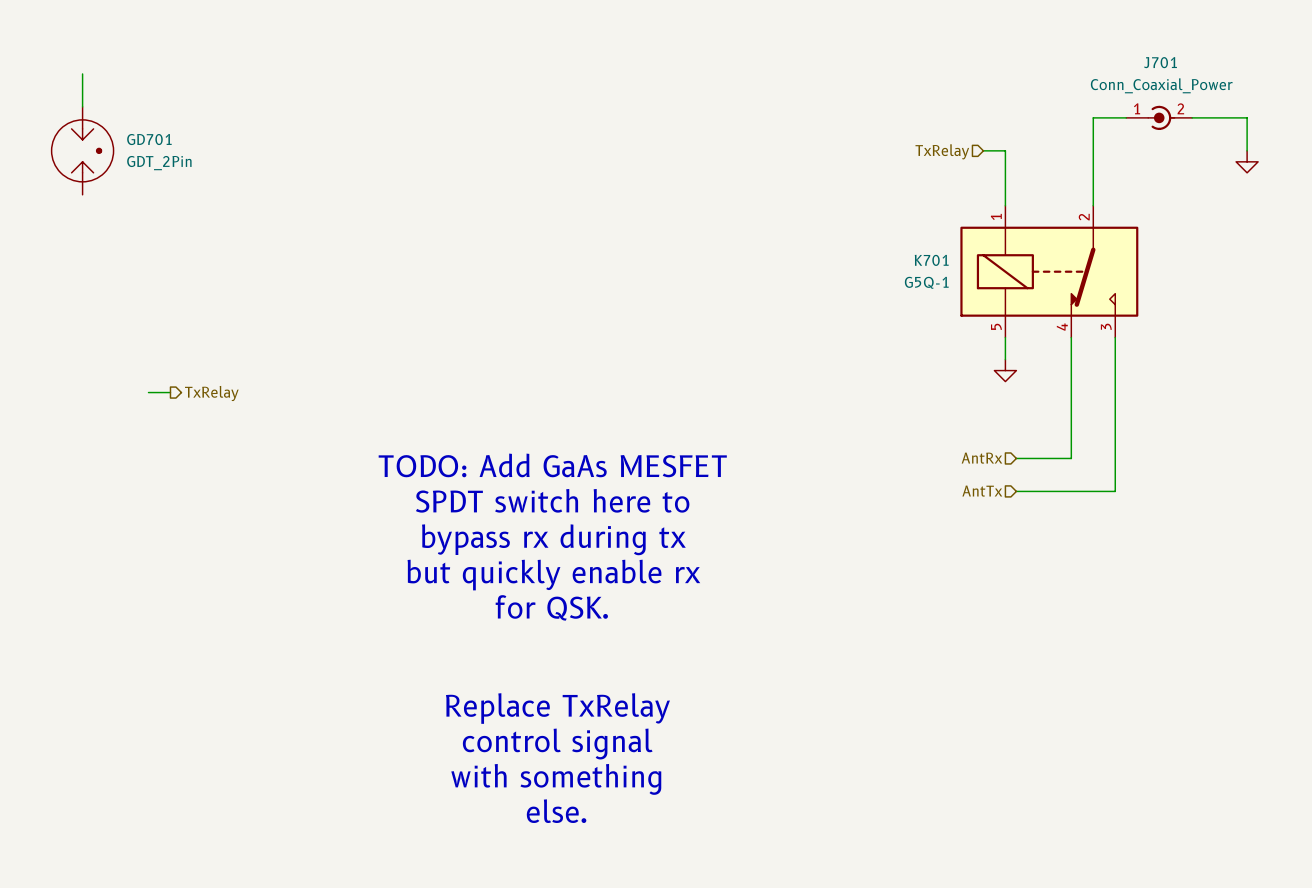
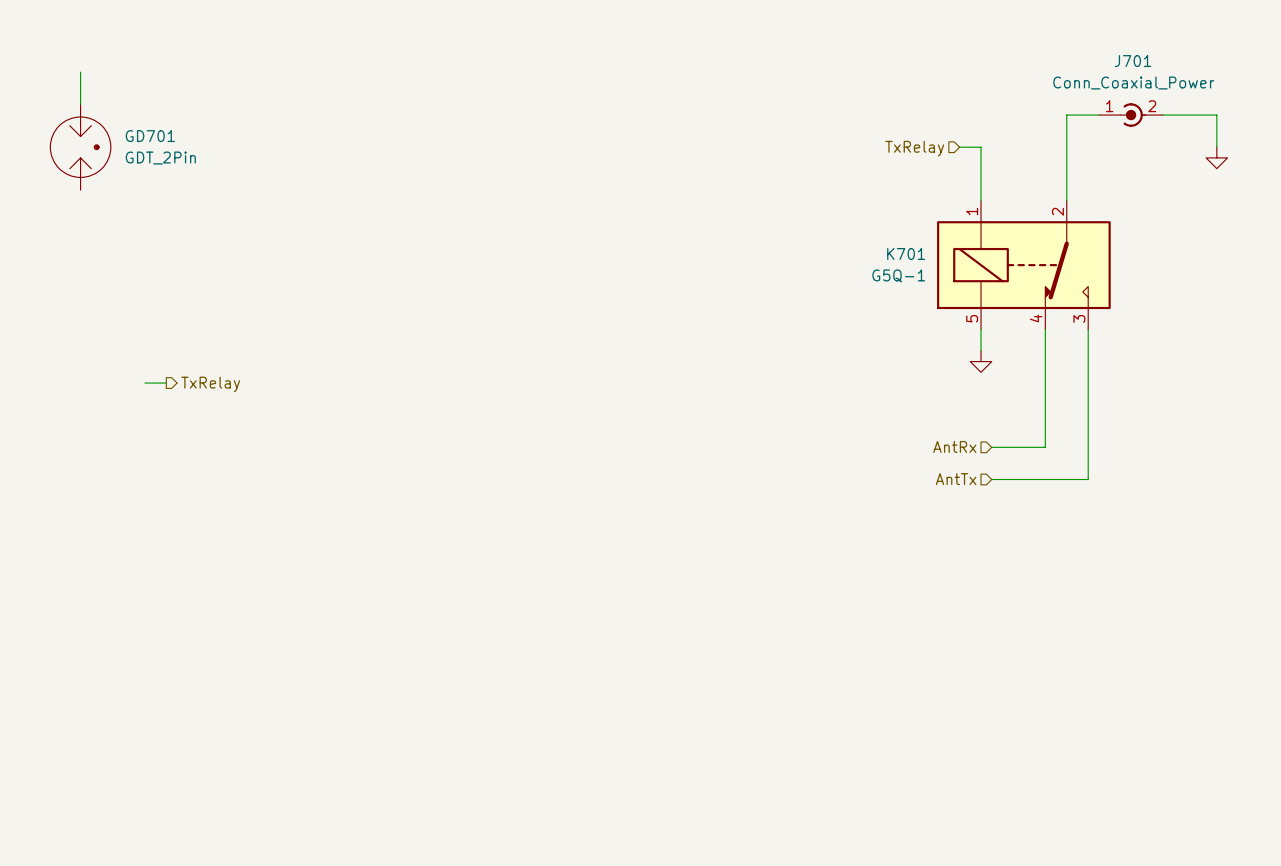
text: TODO: Add GaAs MESFET (552, 465) -> none
text: SPDT switch here to (552, 500) -> none
text: bypass rx during tx (553, 539) -> none
text: but quickly enable rx (553, 575) -> none
text: for QSK. (551, 607) -> none
text: Replace TxRelay (557, 708) -> none
text: control signal (557, 744) -> none
text: with something (556, 779) -> none
text: else. (556, 811) -> none

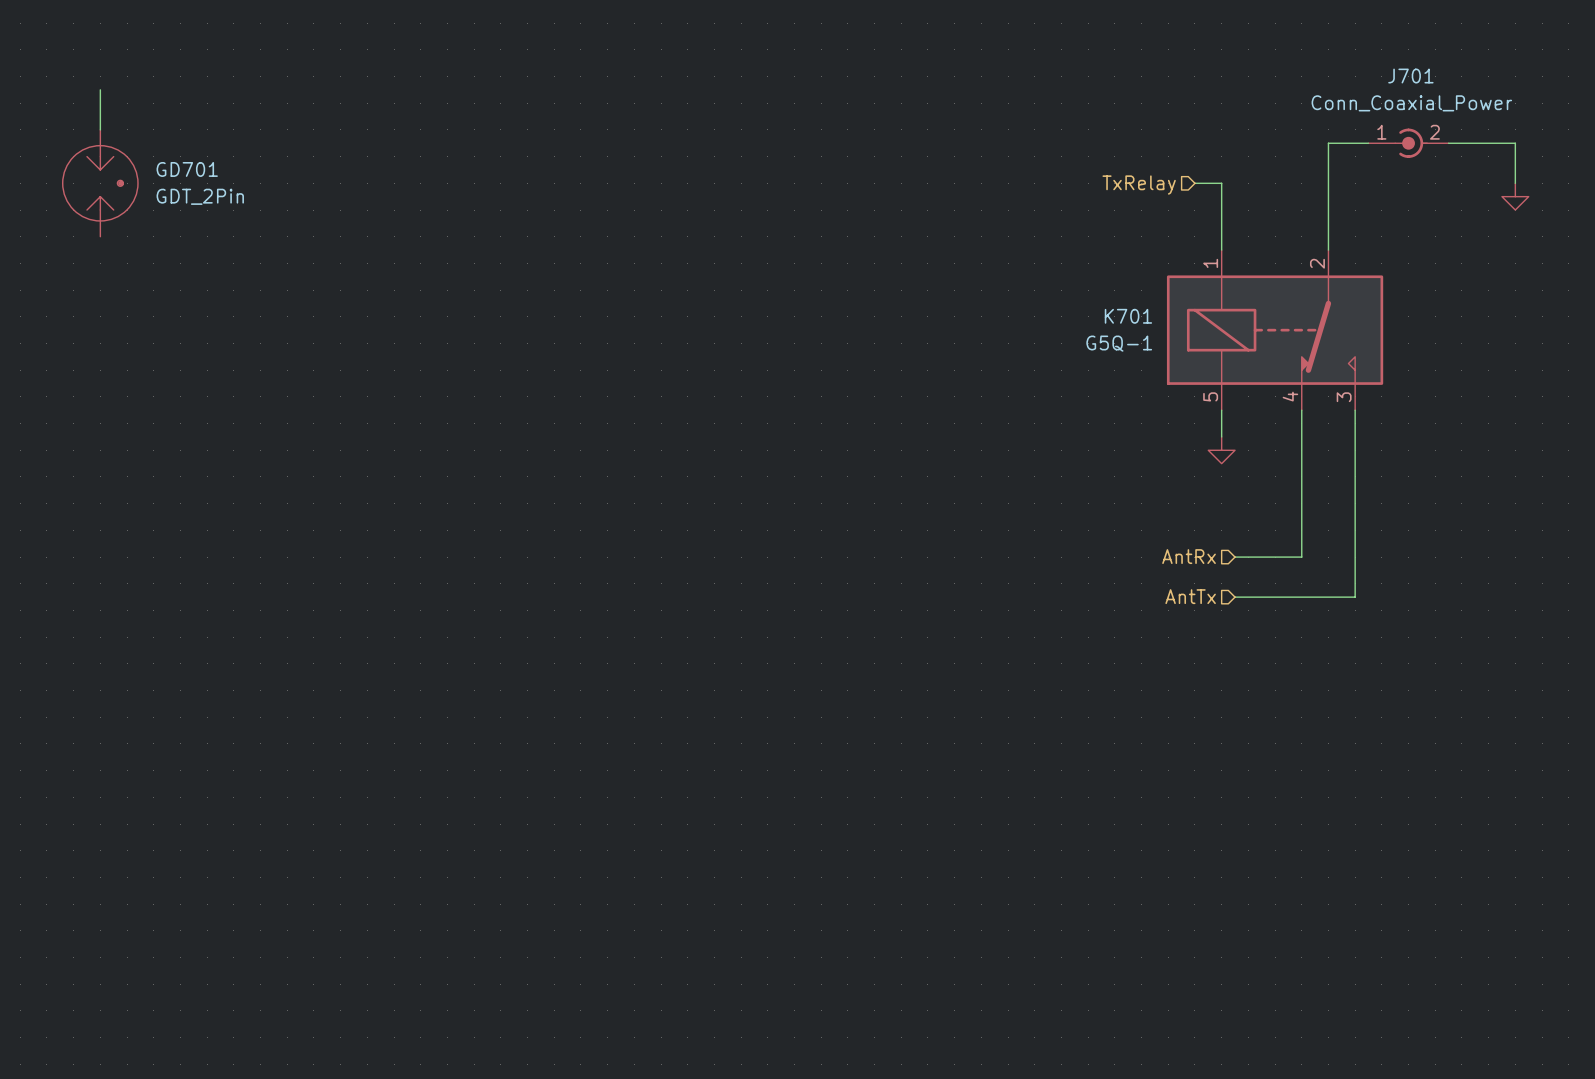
wire: (144, 383) (166, 383) -> none
hierarchical label: TxRelay (210, 384) -> none

